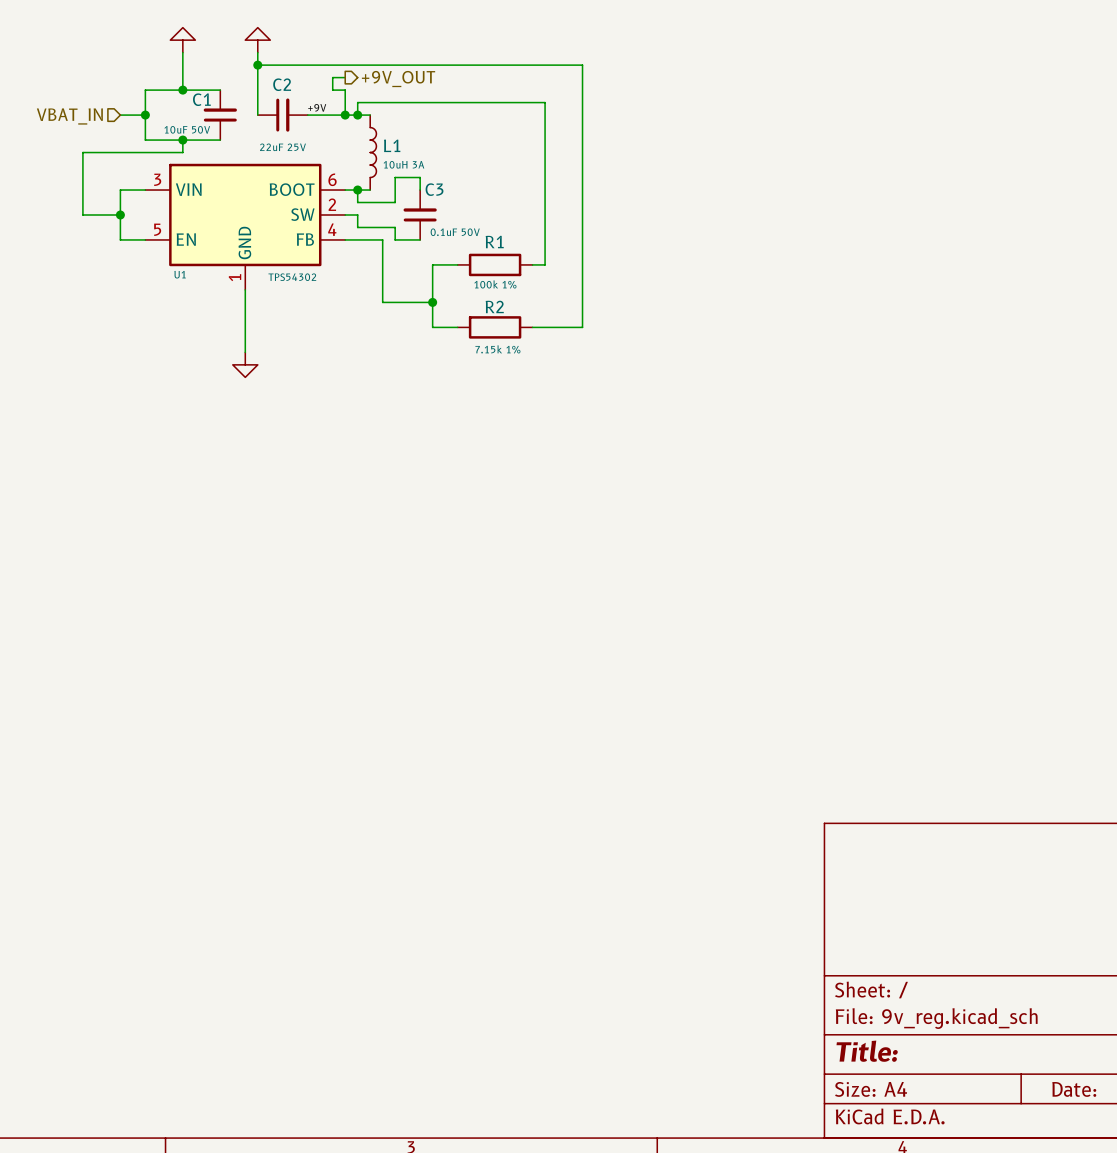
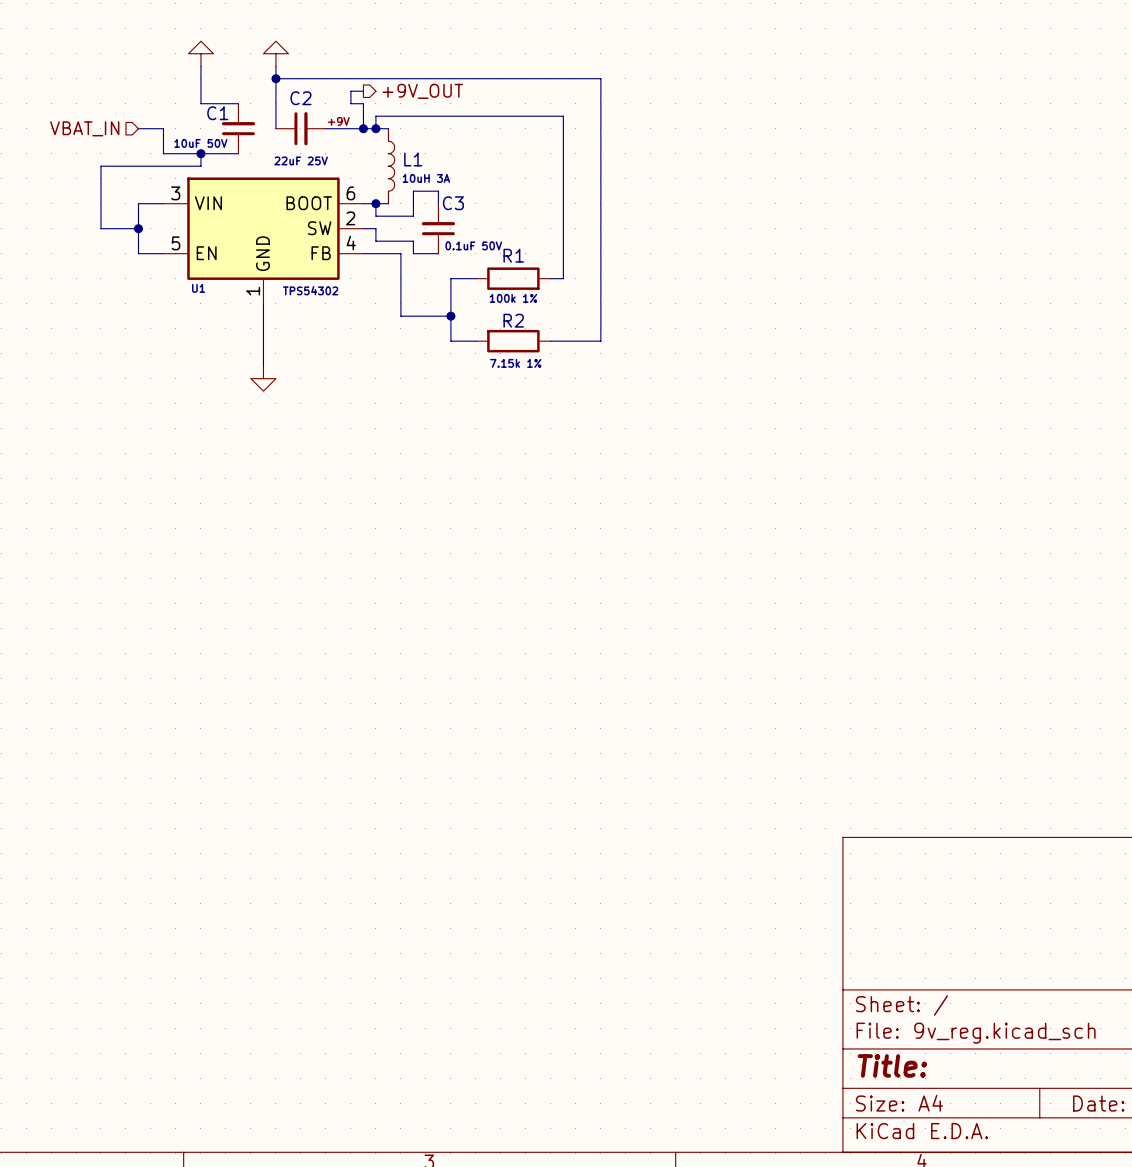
wire: (182, 90) (145, 90) (145, 115) -> none
junction: (182, 90) -> none
junction: (145, 115) -> none

